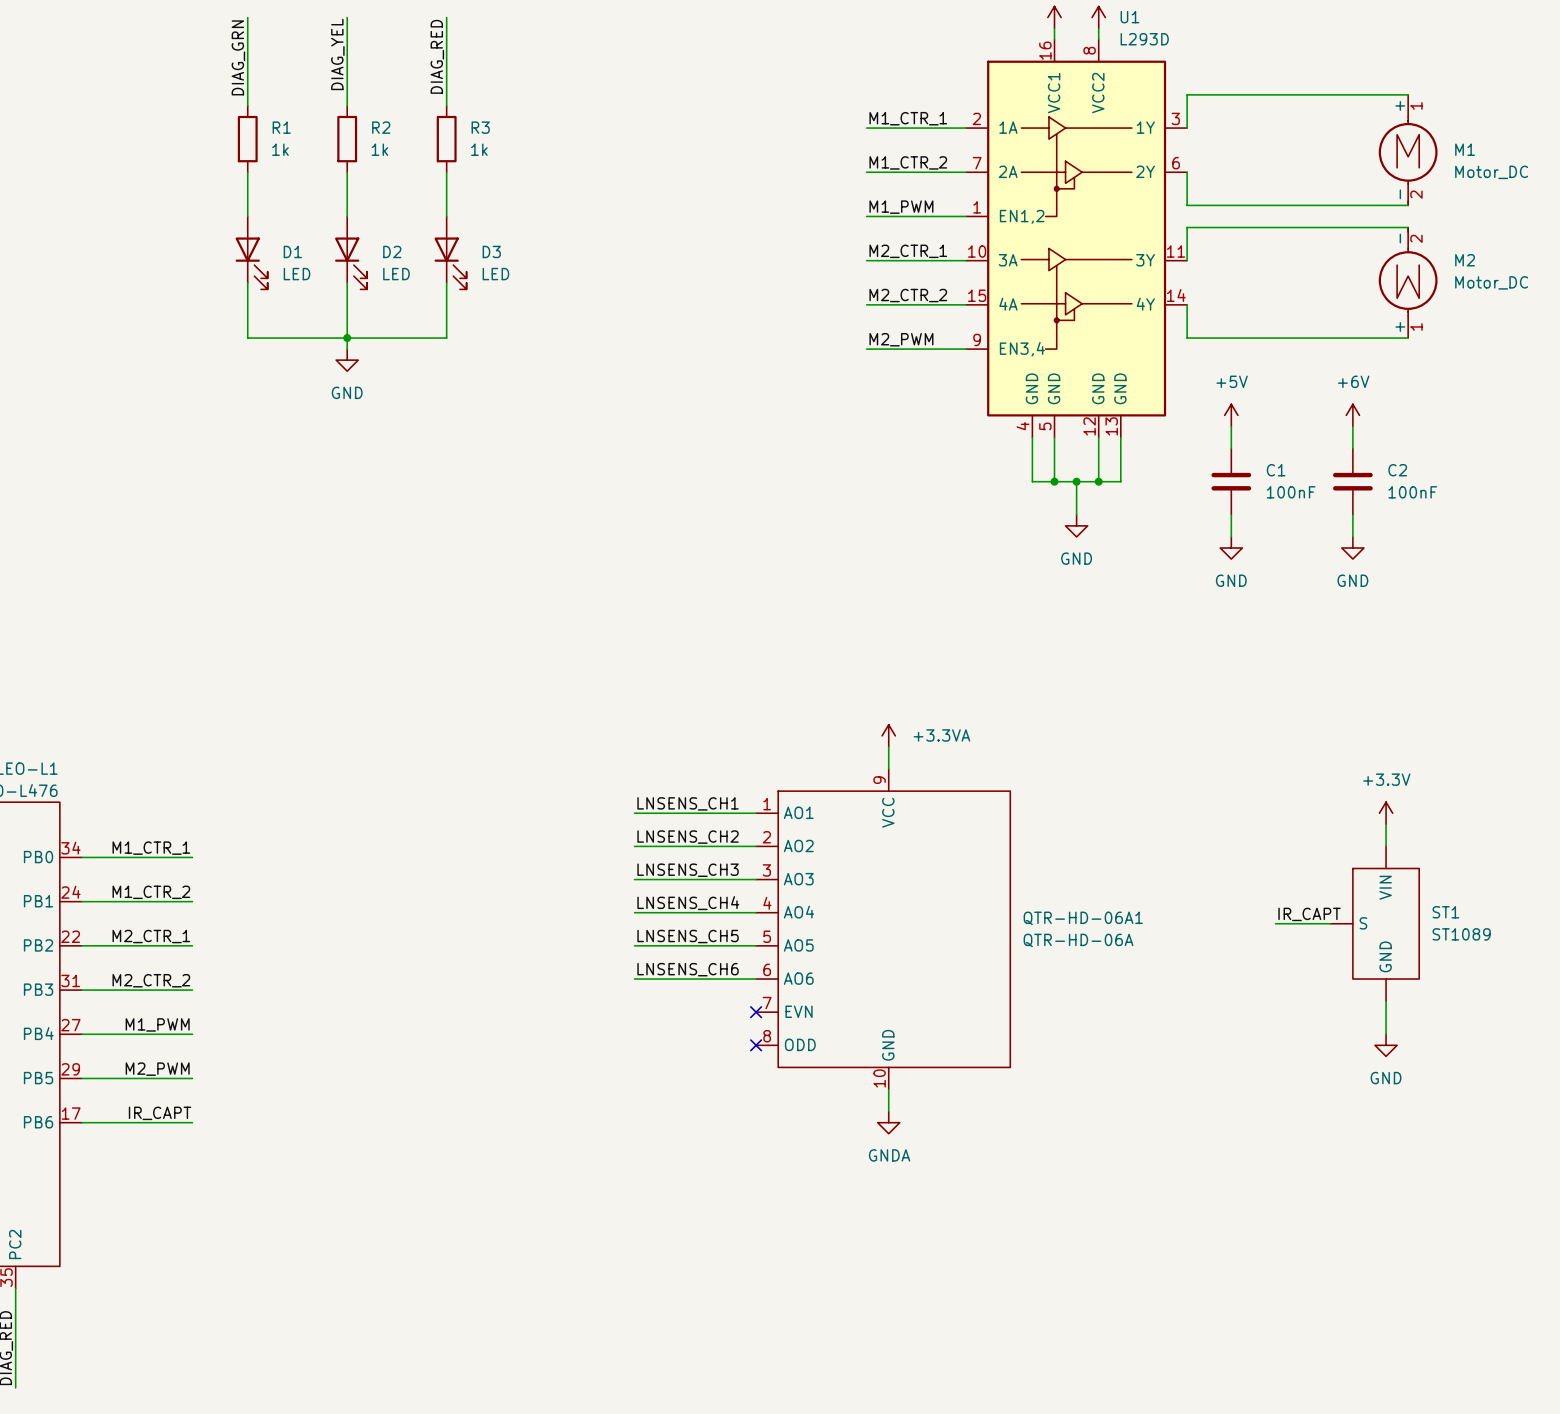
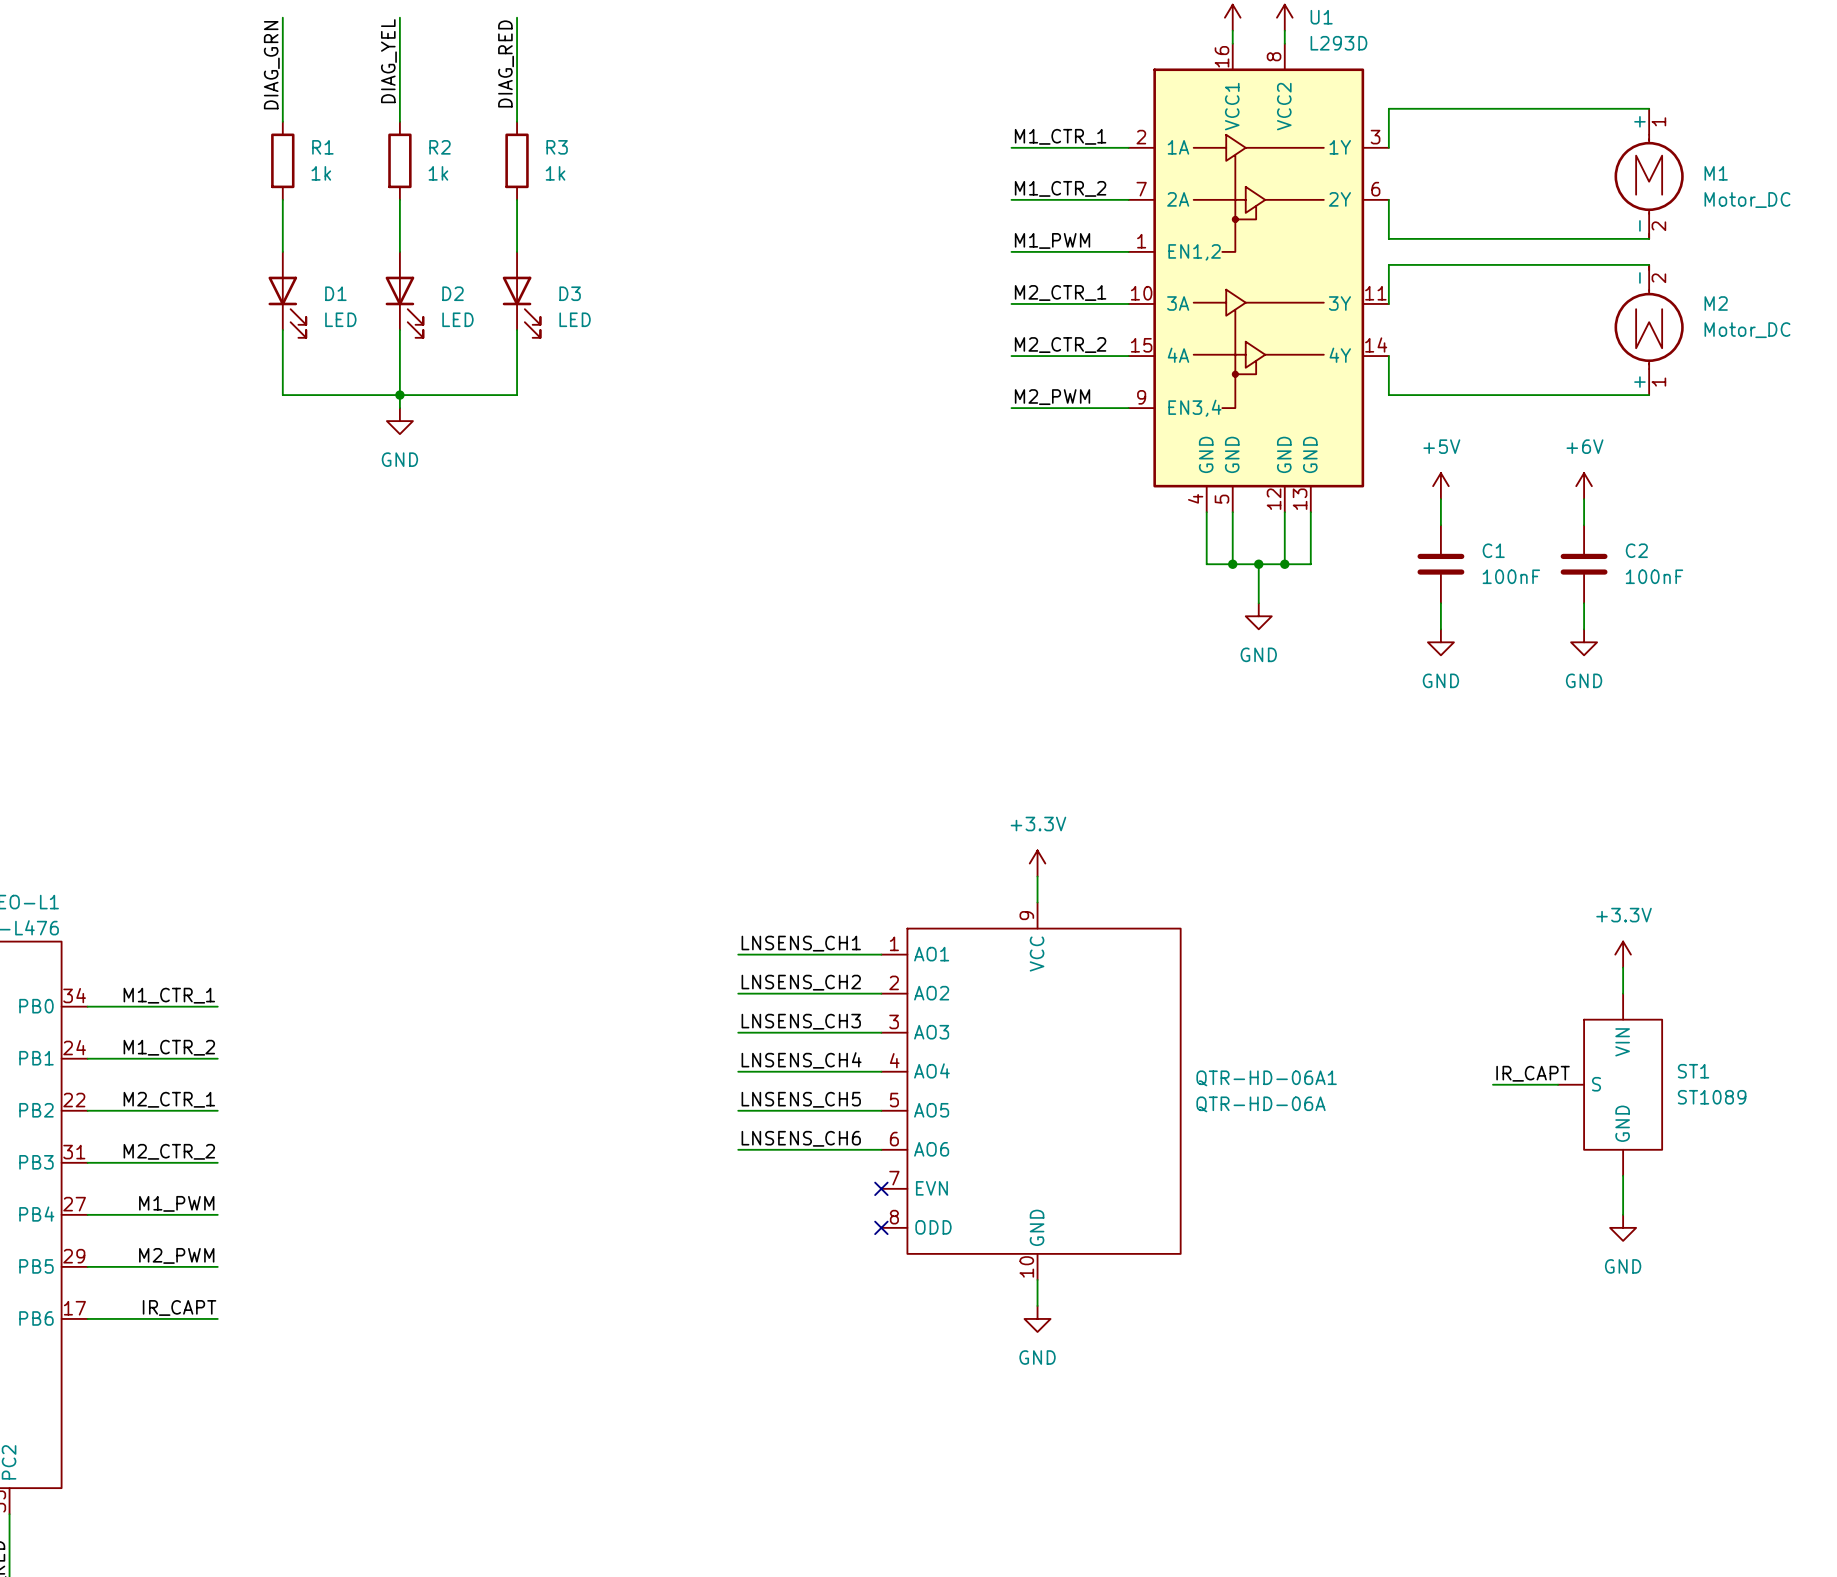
power symbol: +3.3VA (888, 735) -> +3.3V (1037, 863)
power symbol: GNDA (888, 1122) -> GND (1037, 1318)

